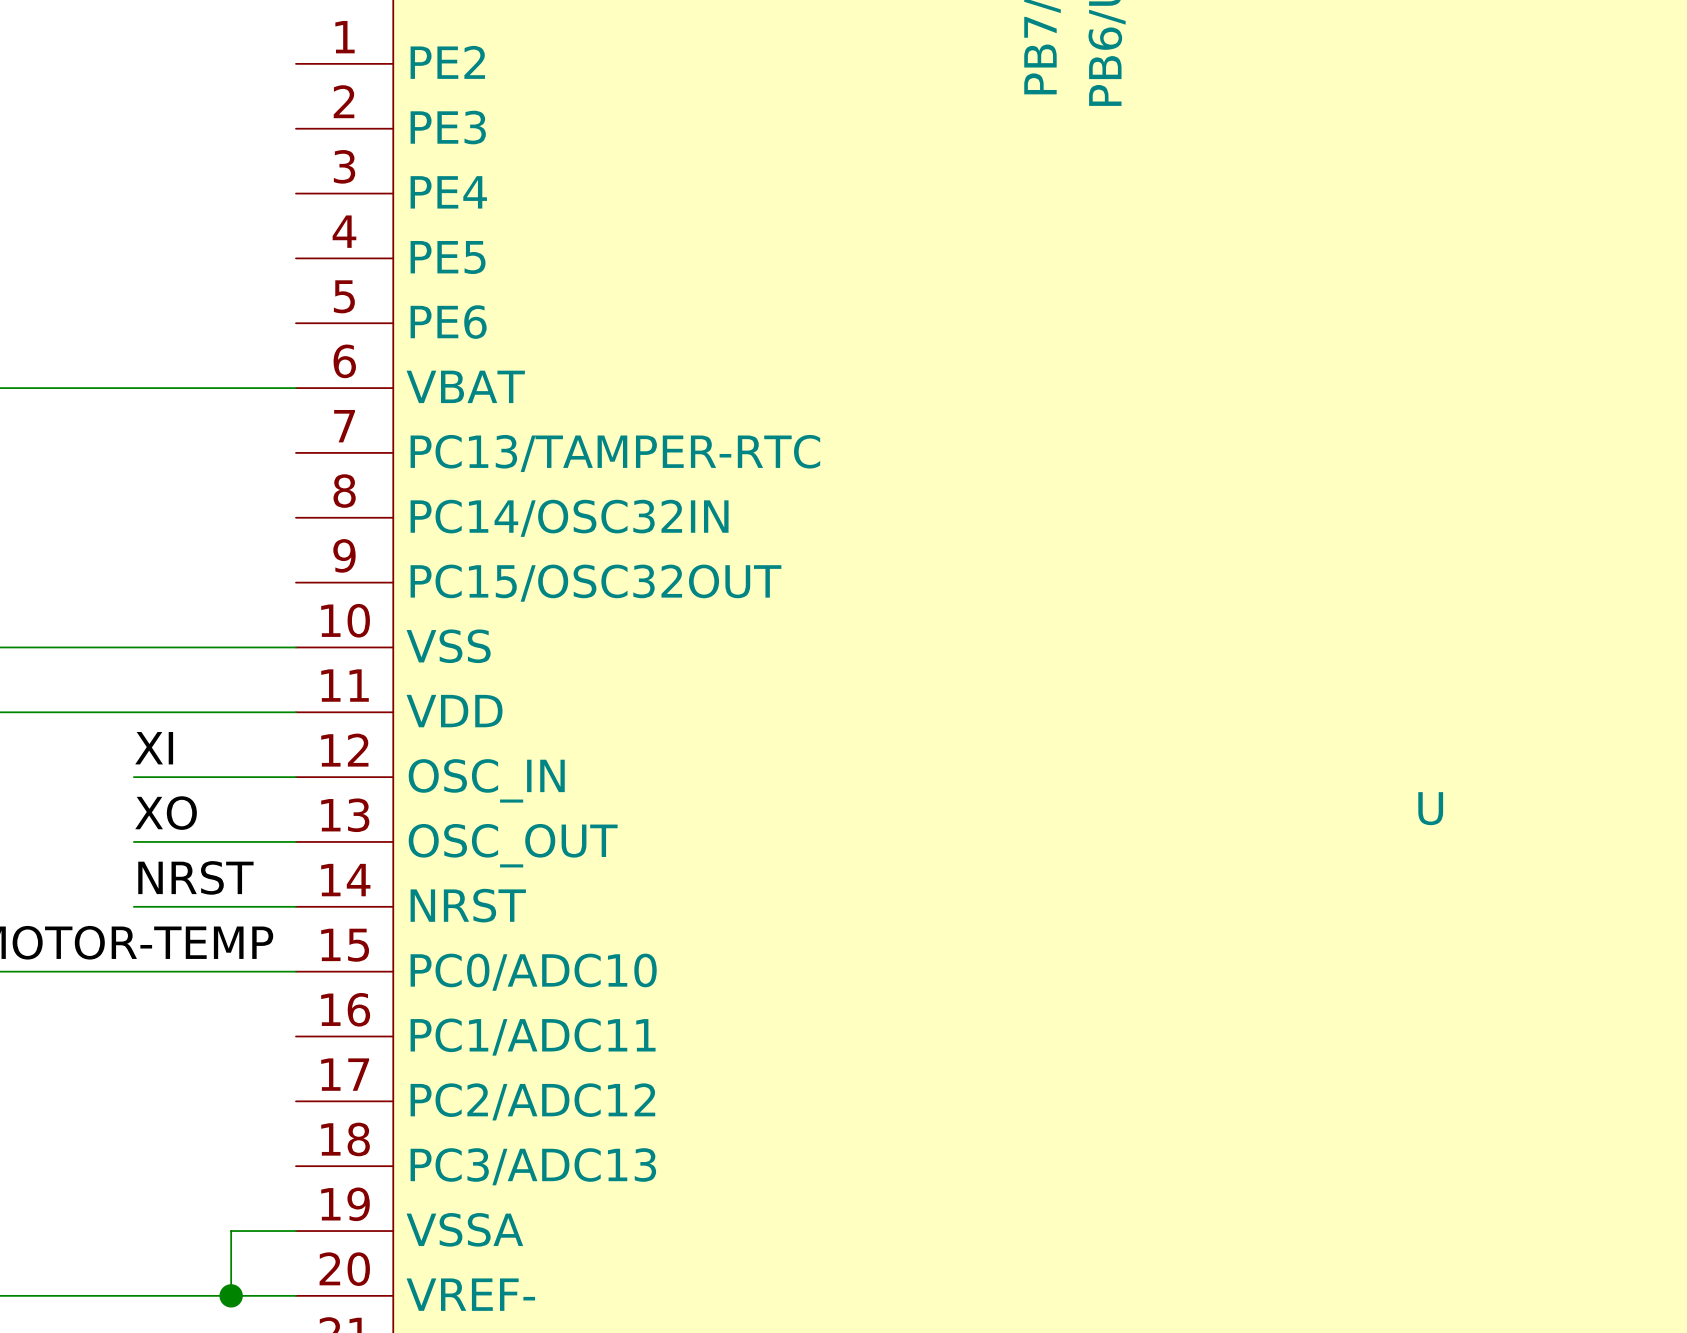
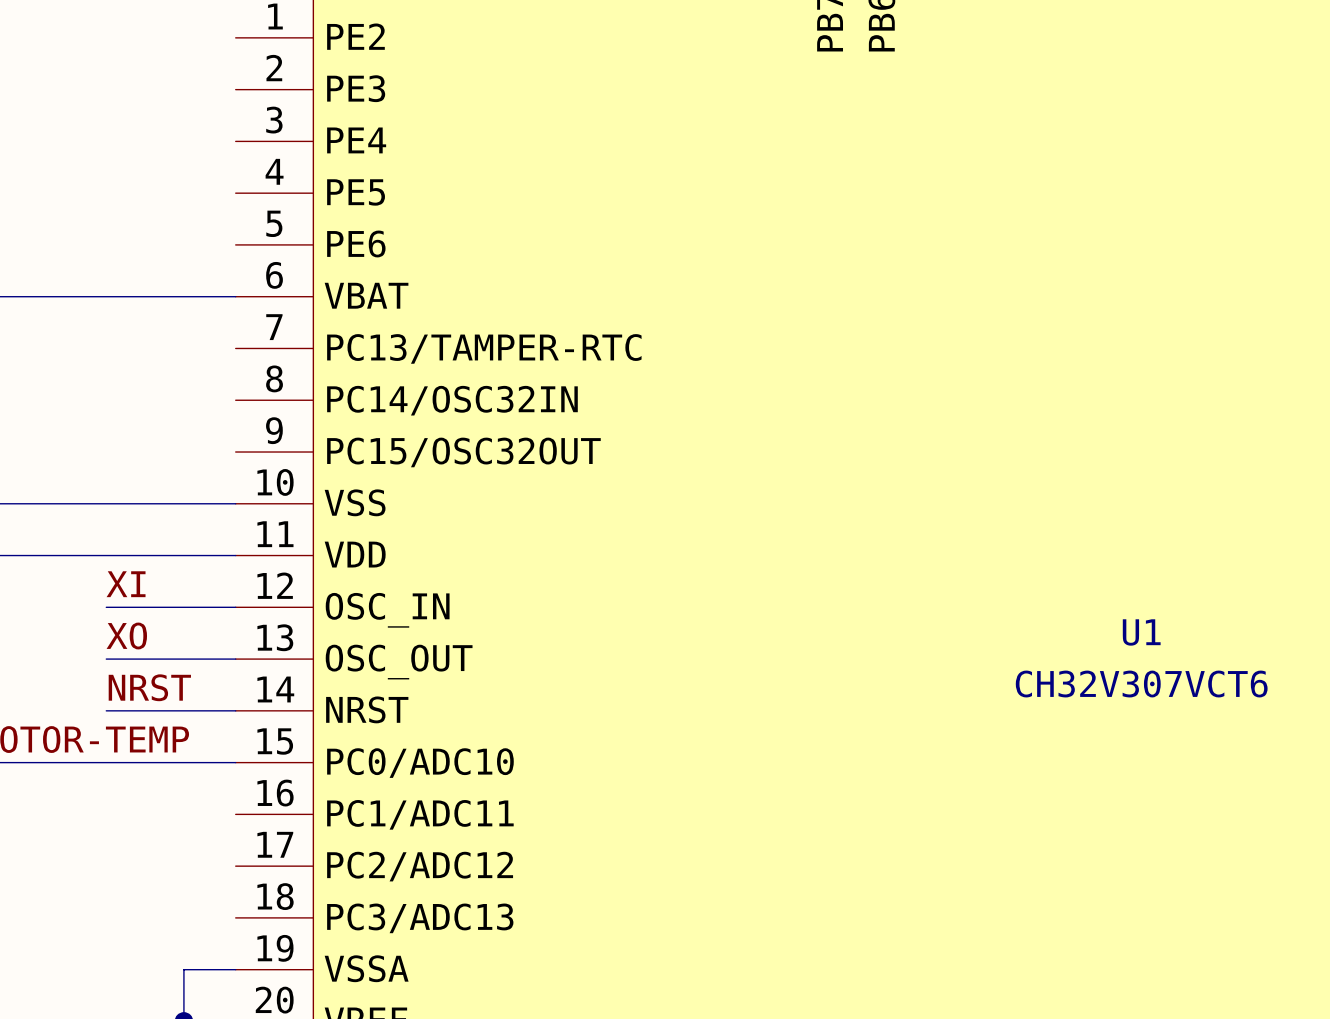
U name: U (1430, 808) -> U1 (1141, 632)
U value: none -> CH32V307VCT6 (1141, 684)

